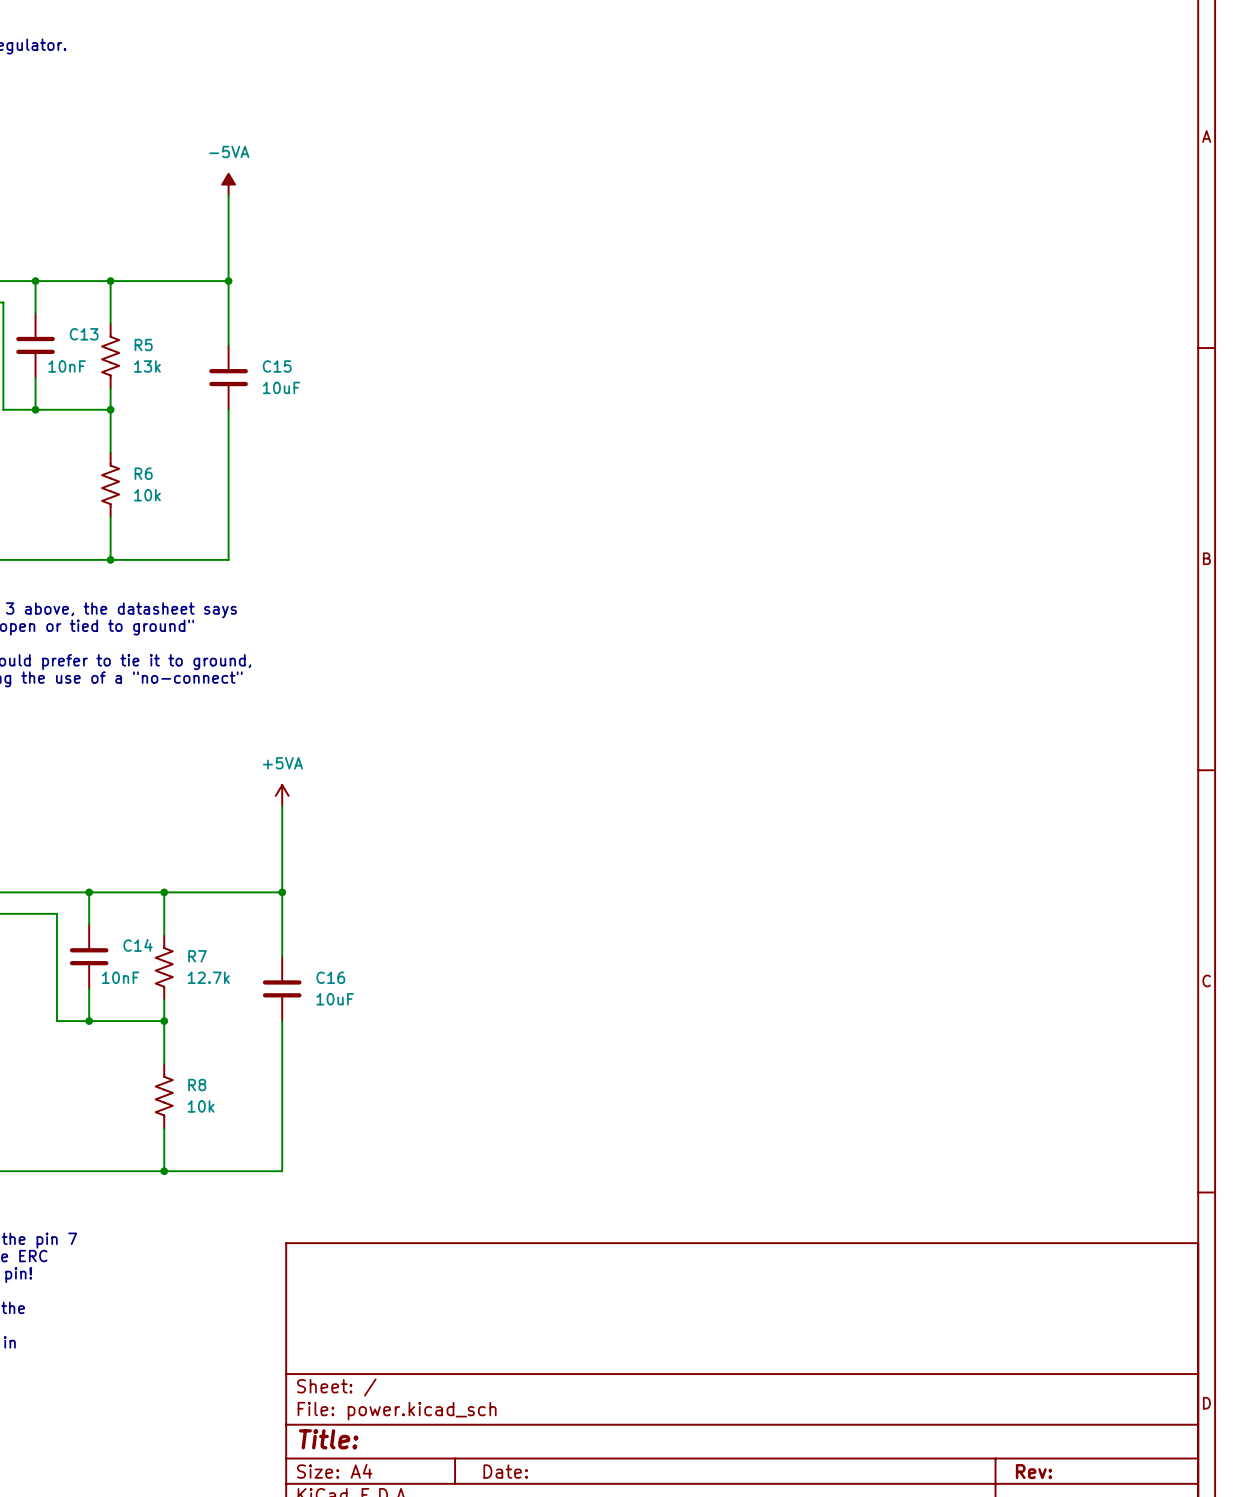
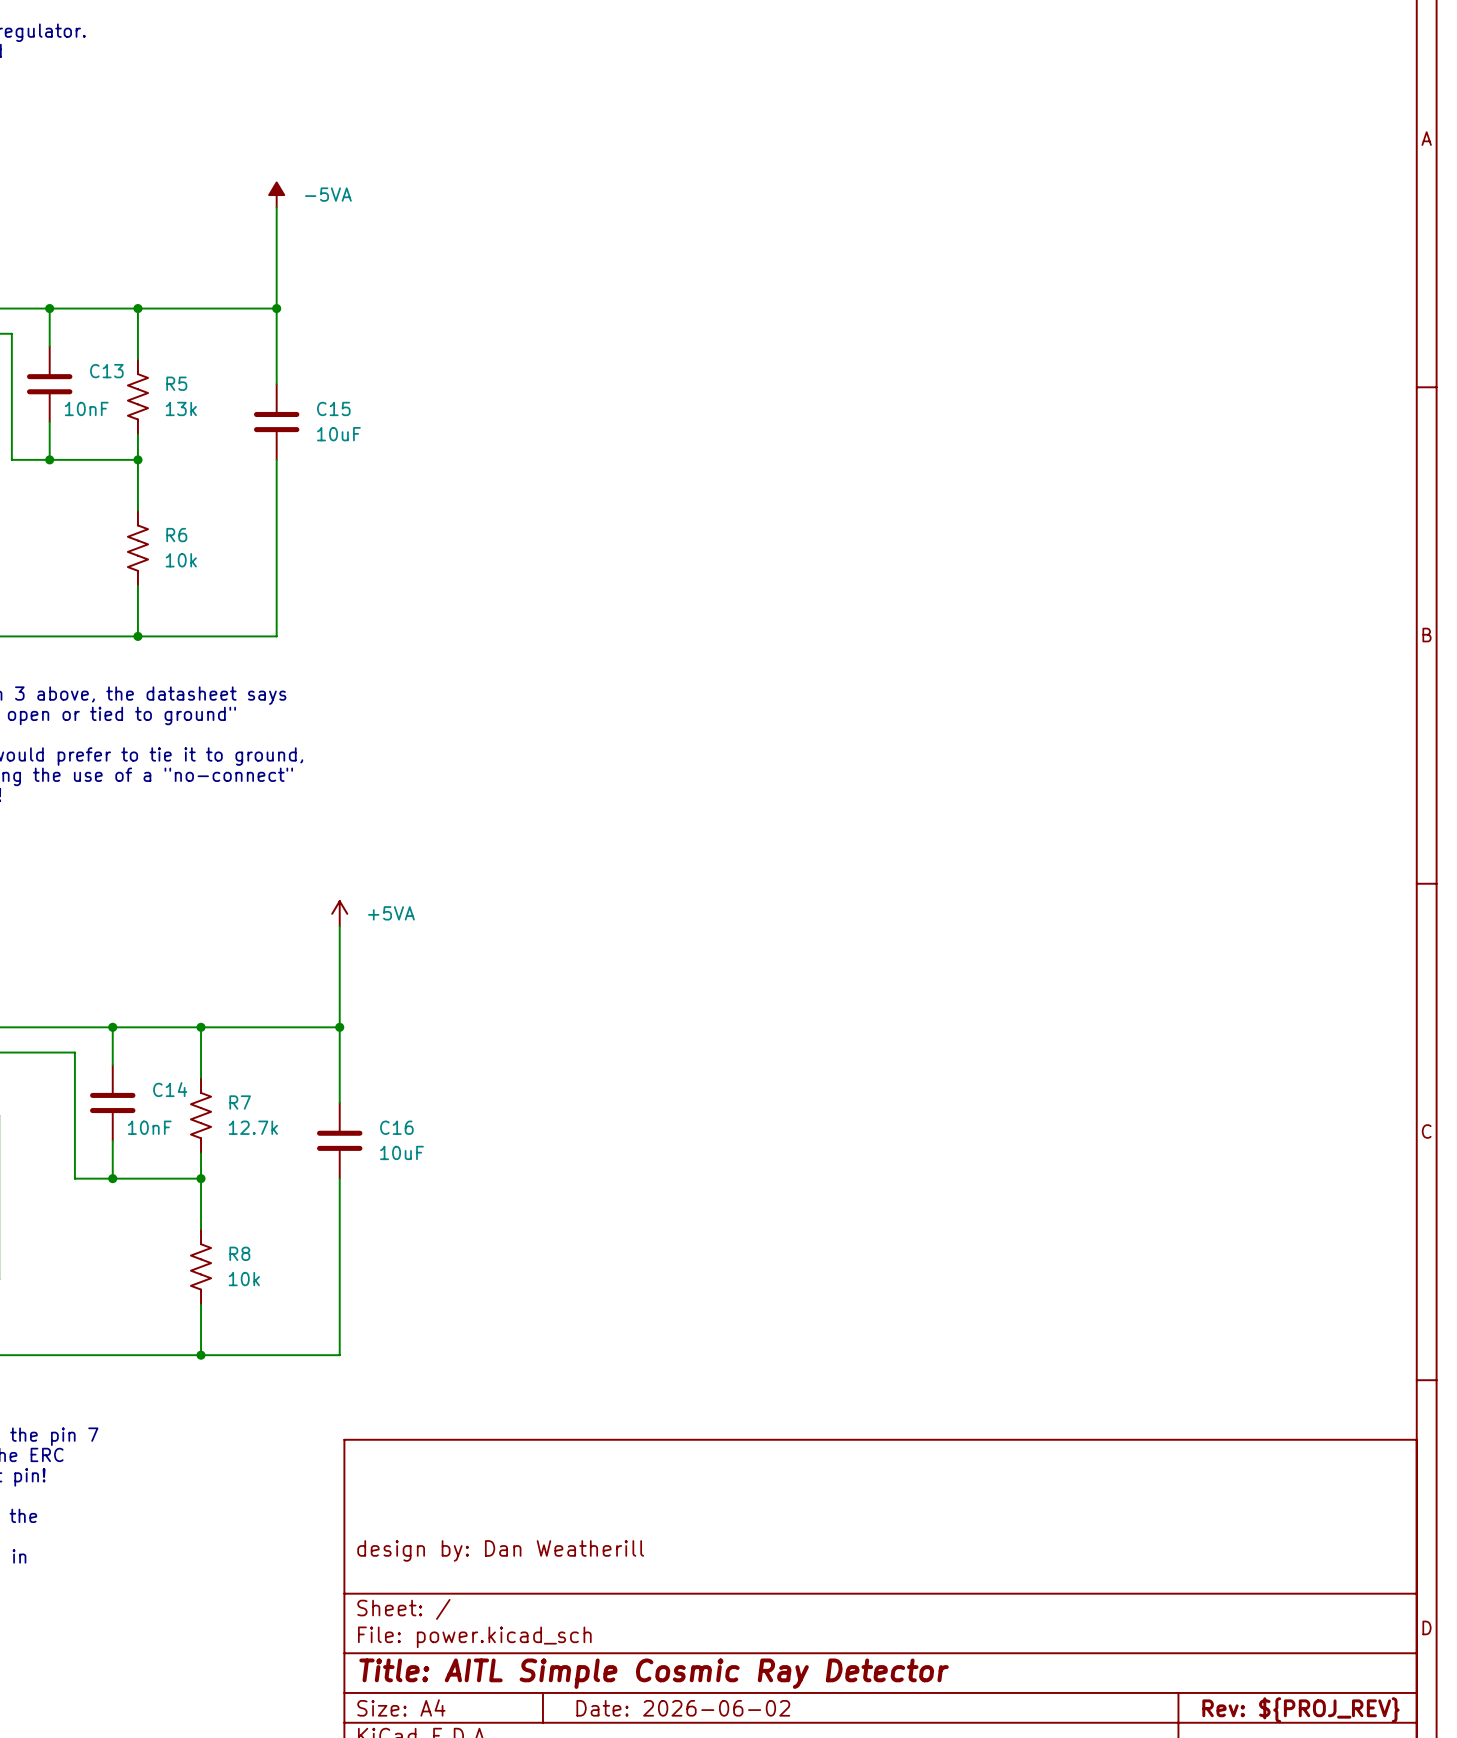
power symbol text position: -5VA (229, 151) -> -5VA (328, 194)
power symbol text position: +5VA (282, 763) -> +5VA (391, 913)
title block: none -> design by: Dan Weatherill (500, 1550)
title block: Title: (328, 1439) -> Title: AITL Simple Cosmic Ray Detector (654, 1673)
title block: Date: (505, 1471) -> Date: 2026-06-02 (683, 1708)
title block: Rev: (1033, 1471) -> Rev: ${PROJ_REV} (1300, 1710)

